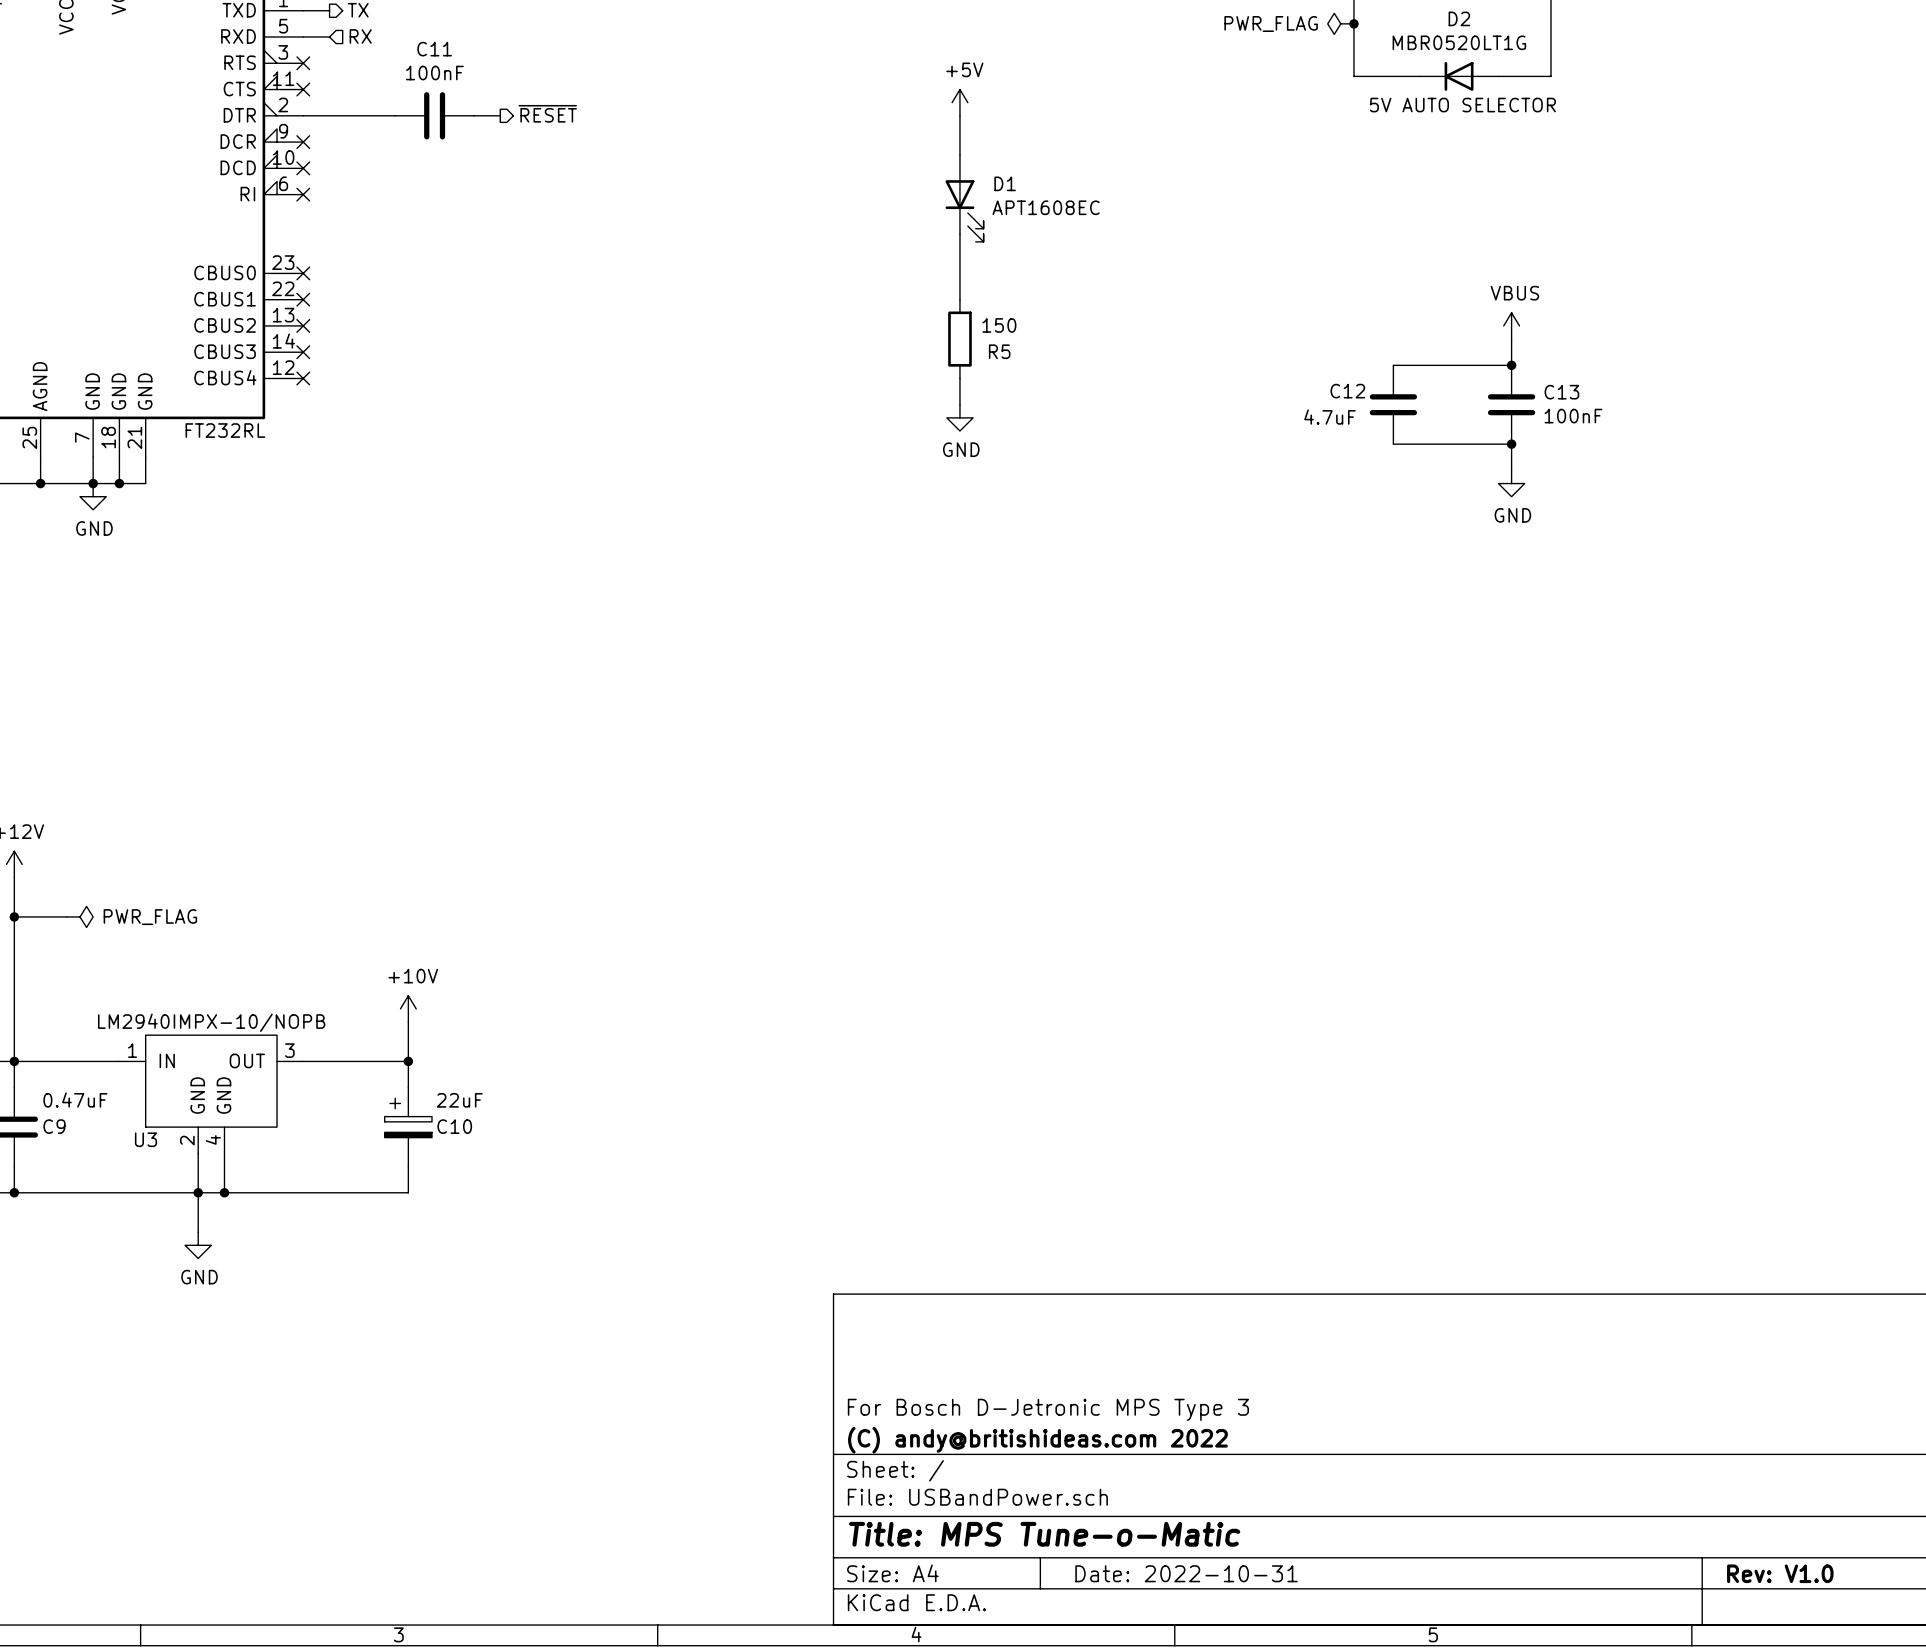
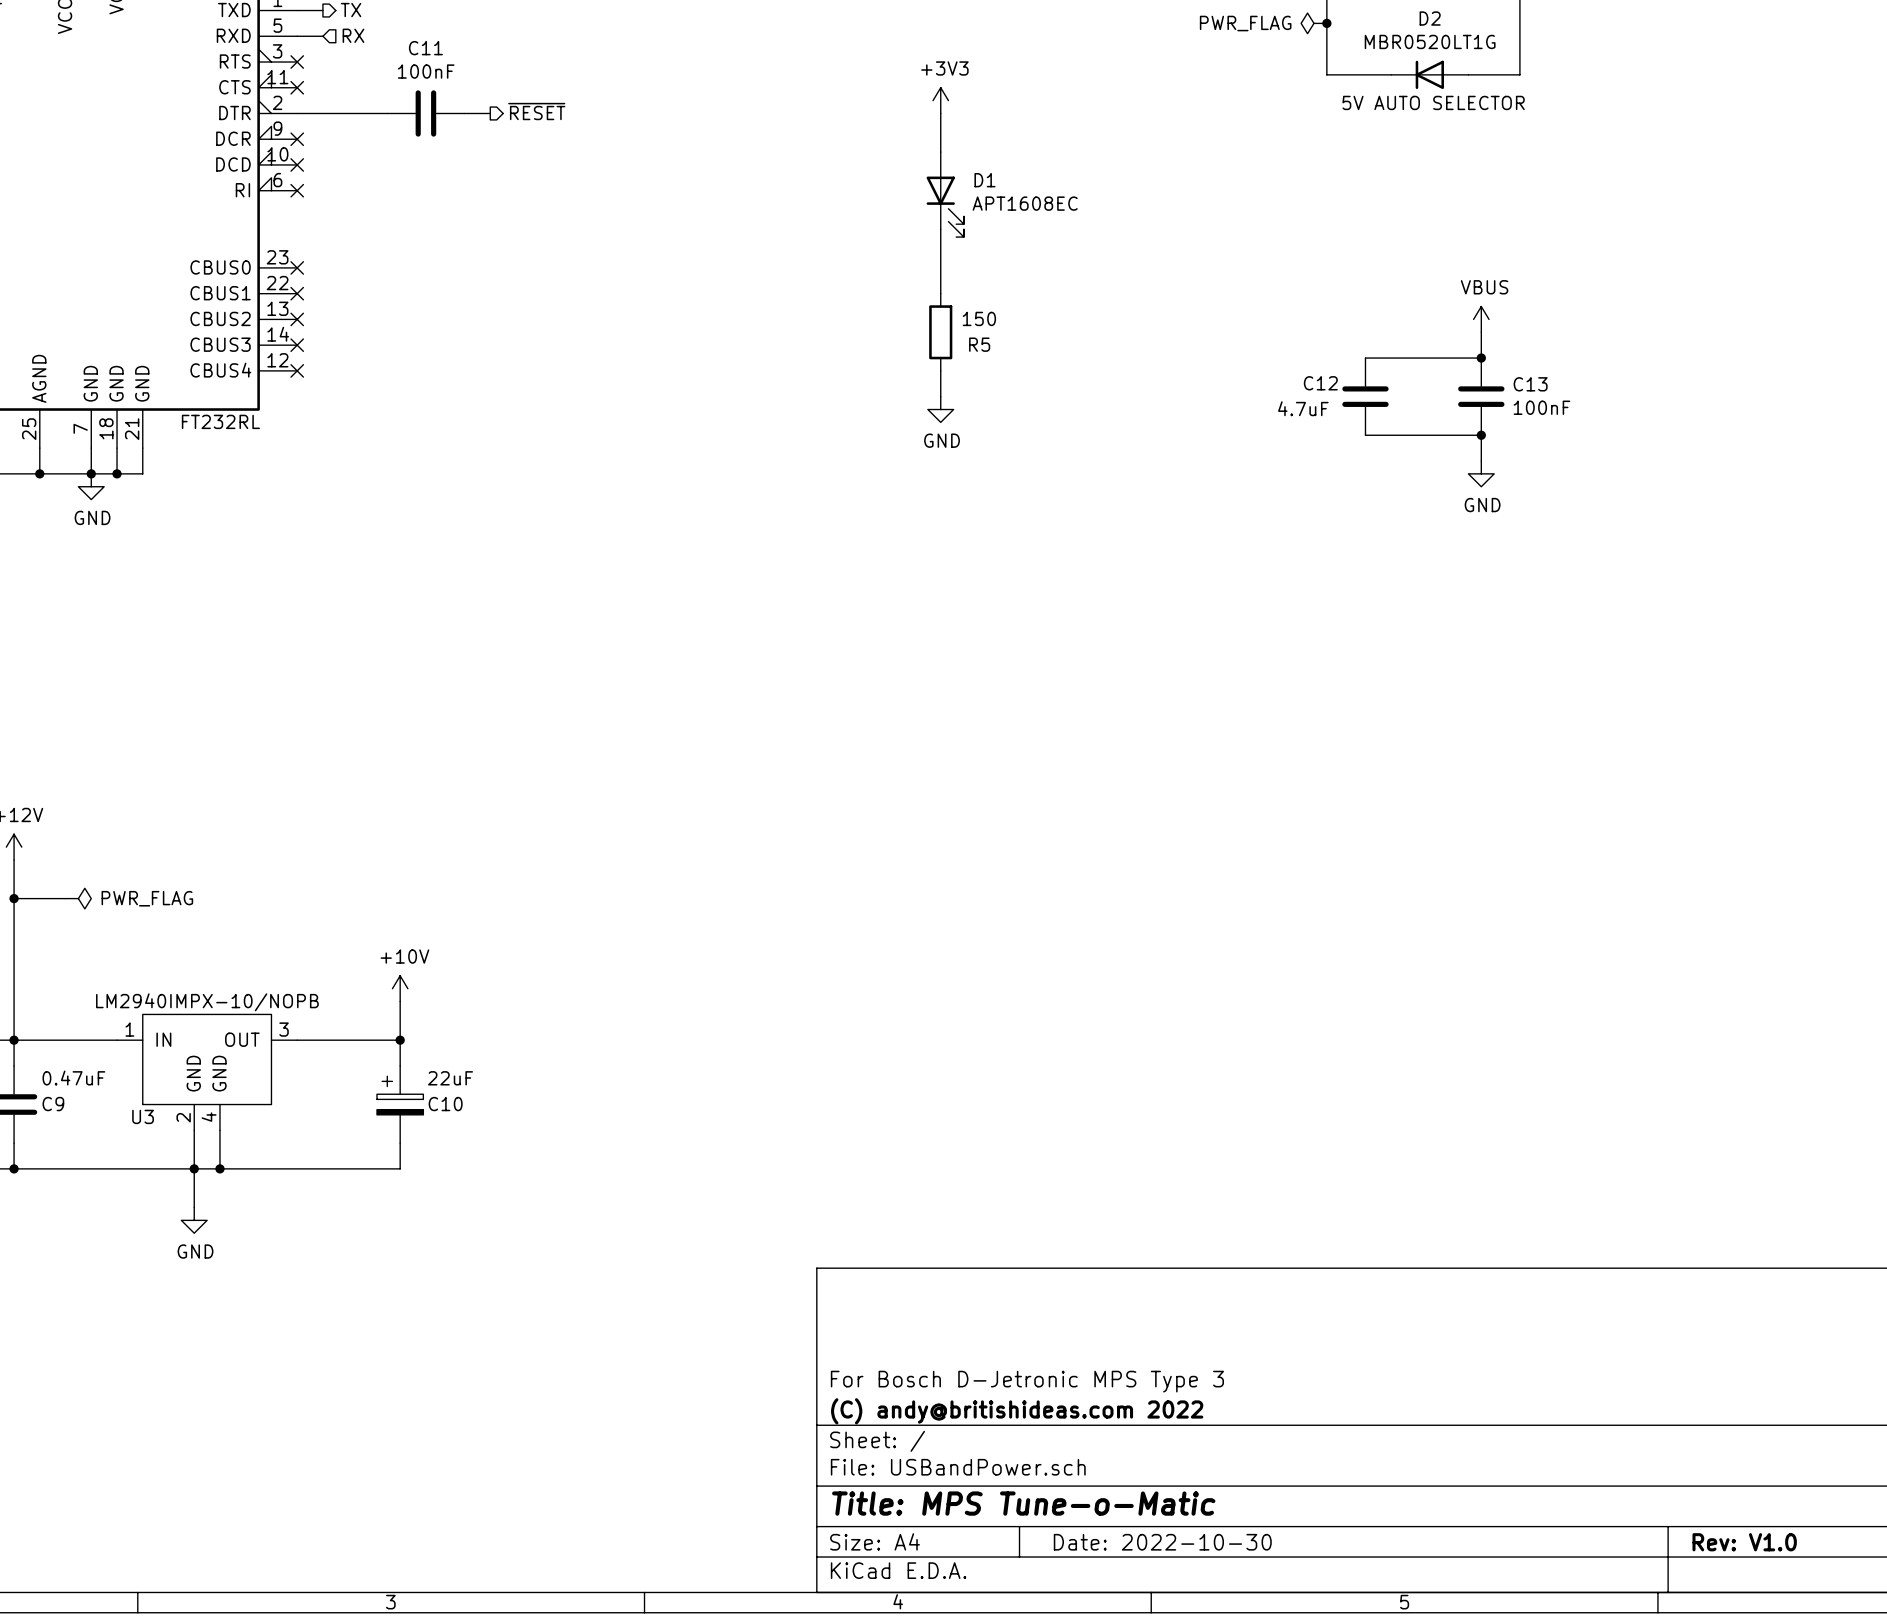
power symbol: +5V (959, 102) -> +3V3 (940, 100)
title block: Date: 2022-10-31 (1186, 1573) -> Date: 2022-10-30 (1162, 1542)

